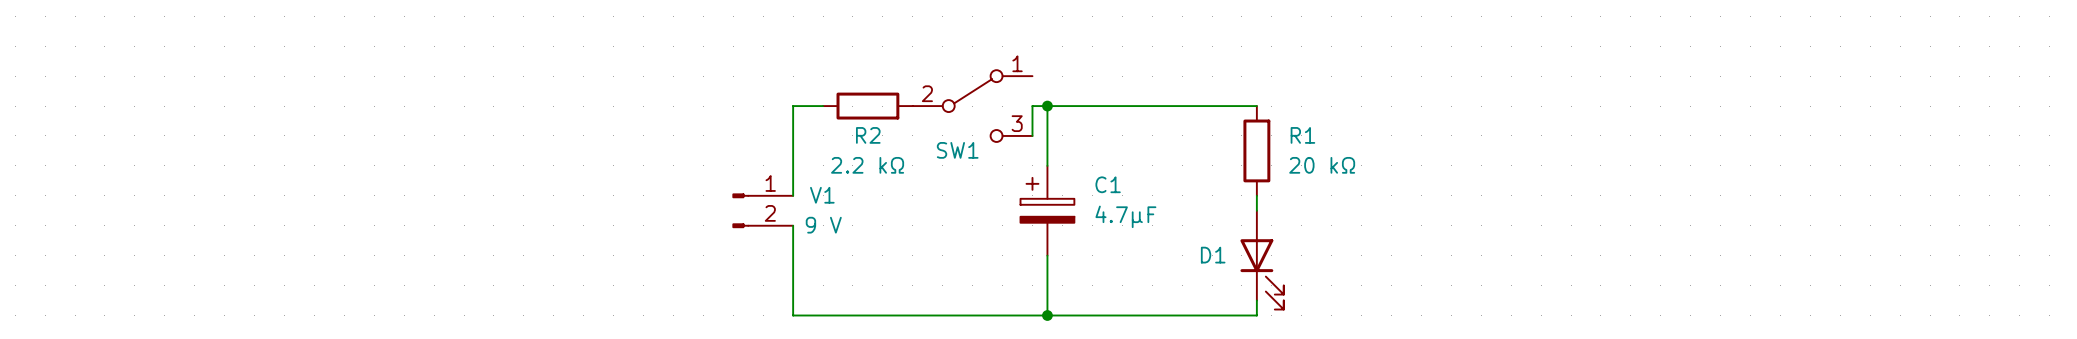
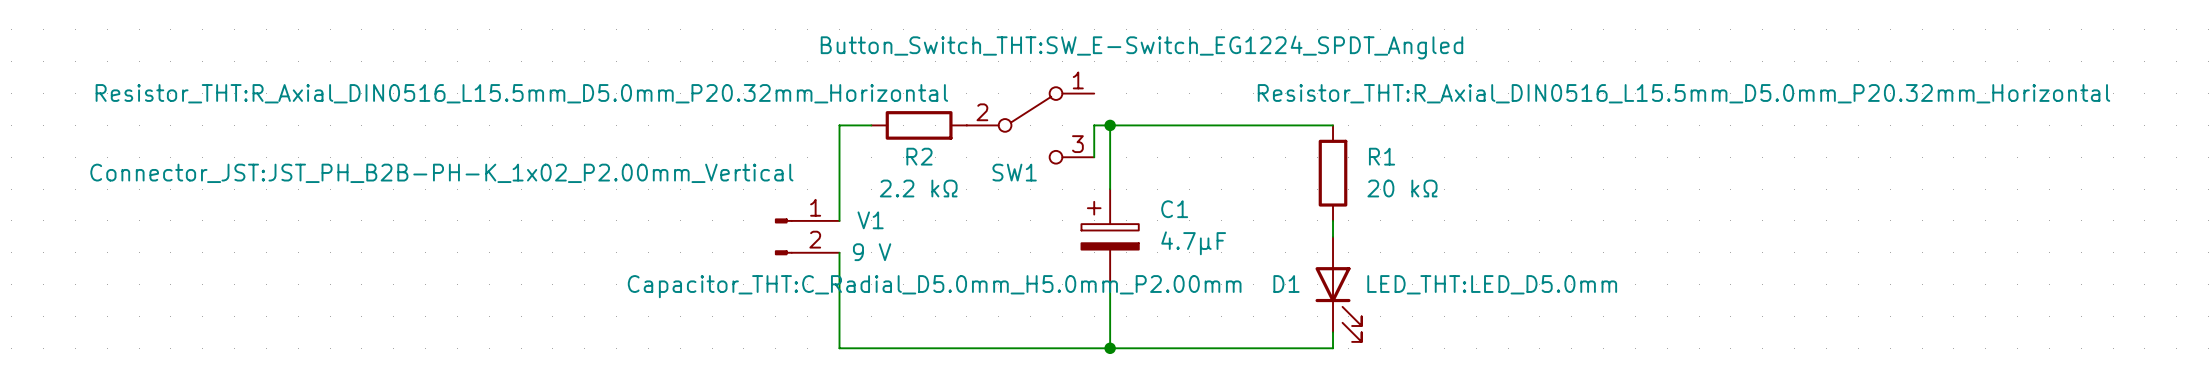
SW1 text: none -> Button_Switch_THT:SW_E-Switch_EG1224_SPDT_Angled (1141, 47)
R2 text: none -> Resistor_THT:R_Axial_DIN0516_L15.5mm_D5.0mm_P20.32mm_Horizontal (521, 93)
R1 text: none -> Resistor_THT:R_Axial_DIN0516_L15.5mm_D5.0mm_P20.32mm_Horizontal (1683, 93)
V1 text: none -> Connector_JST:JST_PH_B2B-PH-K_1x02_P2.00mm_Vertical (441, 173)
D1 text: none -> LED_THT:LED_D5.0mm (1492, 284)
C1 text: none -> Capacitor_THT:C_Radial_D5.0mm_H5.0mm_P2.00mm (934, 286)

